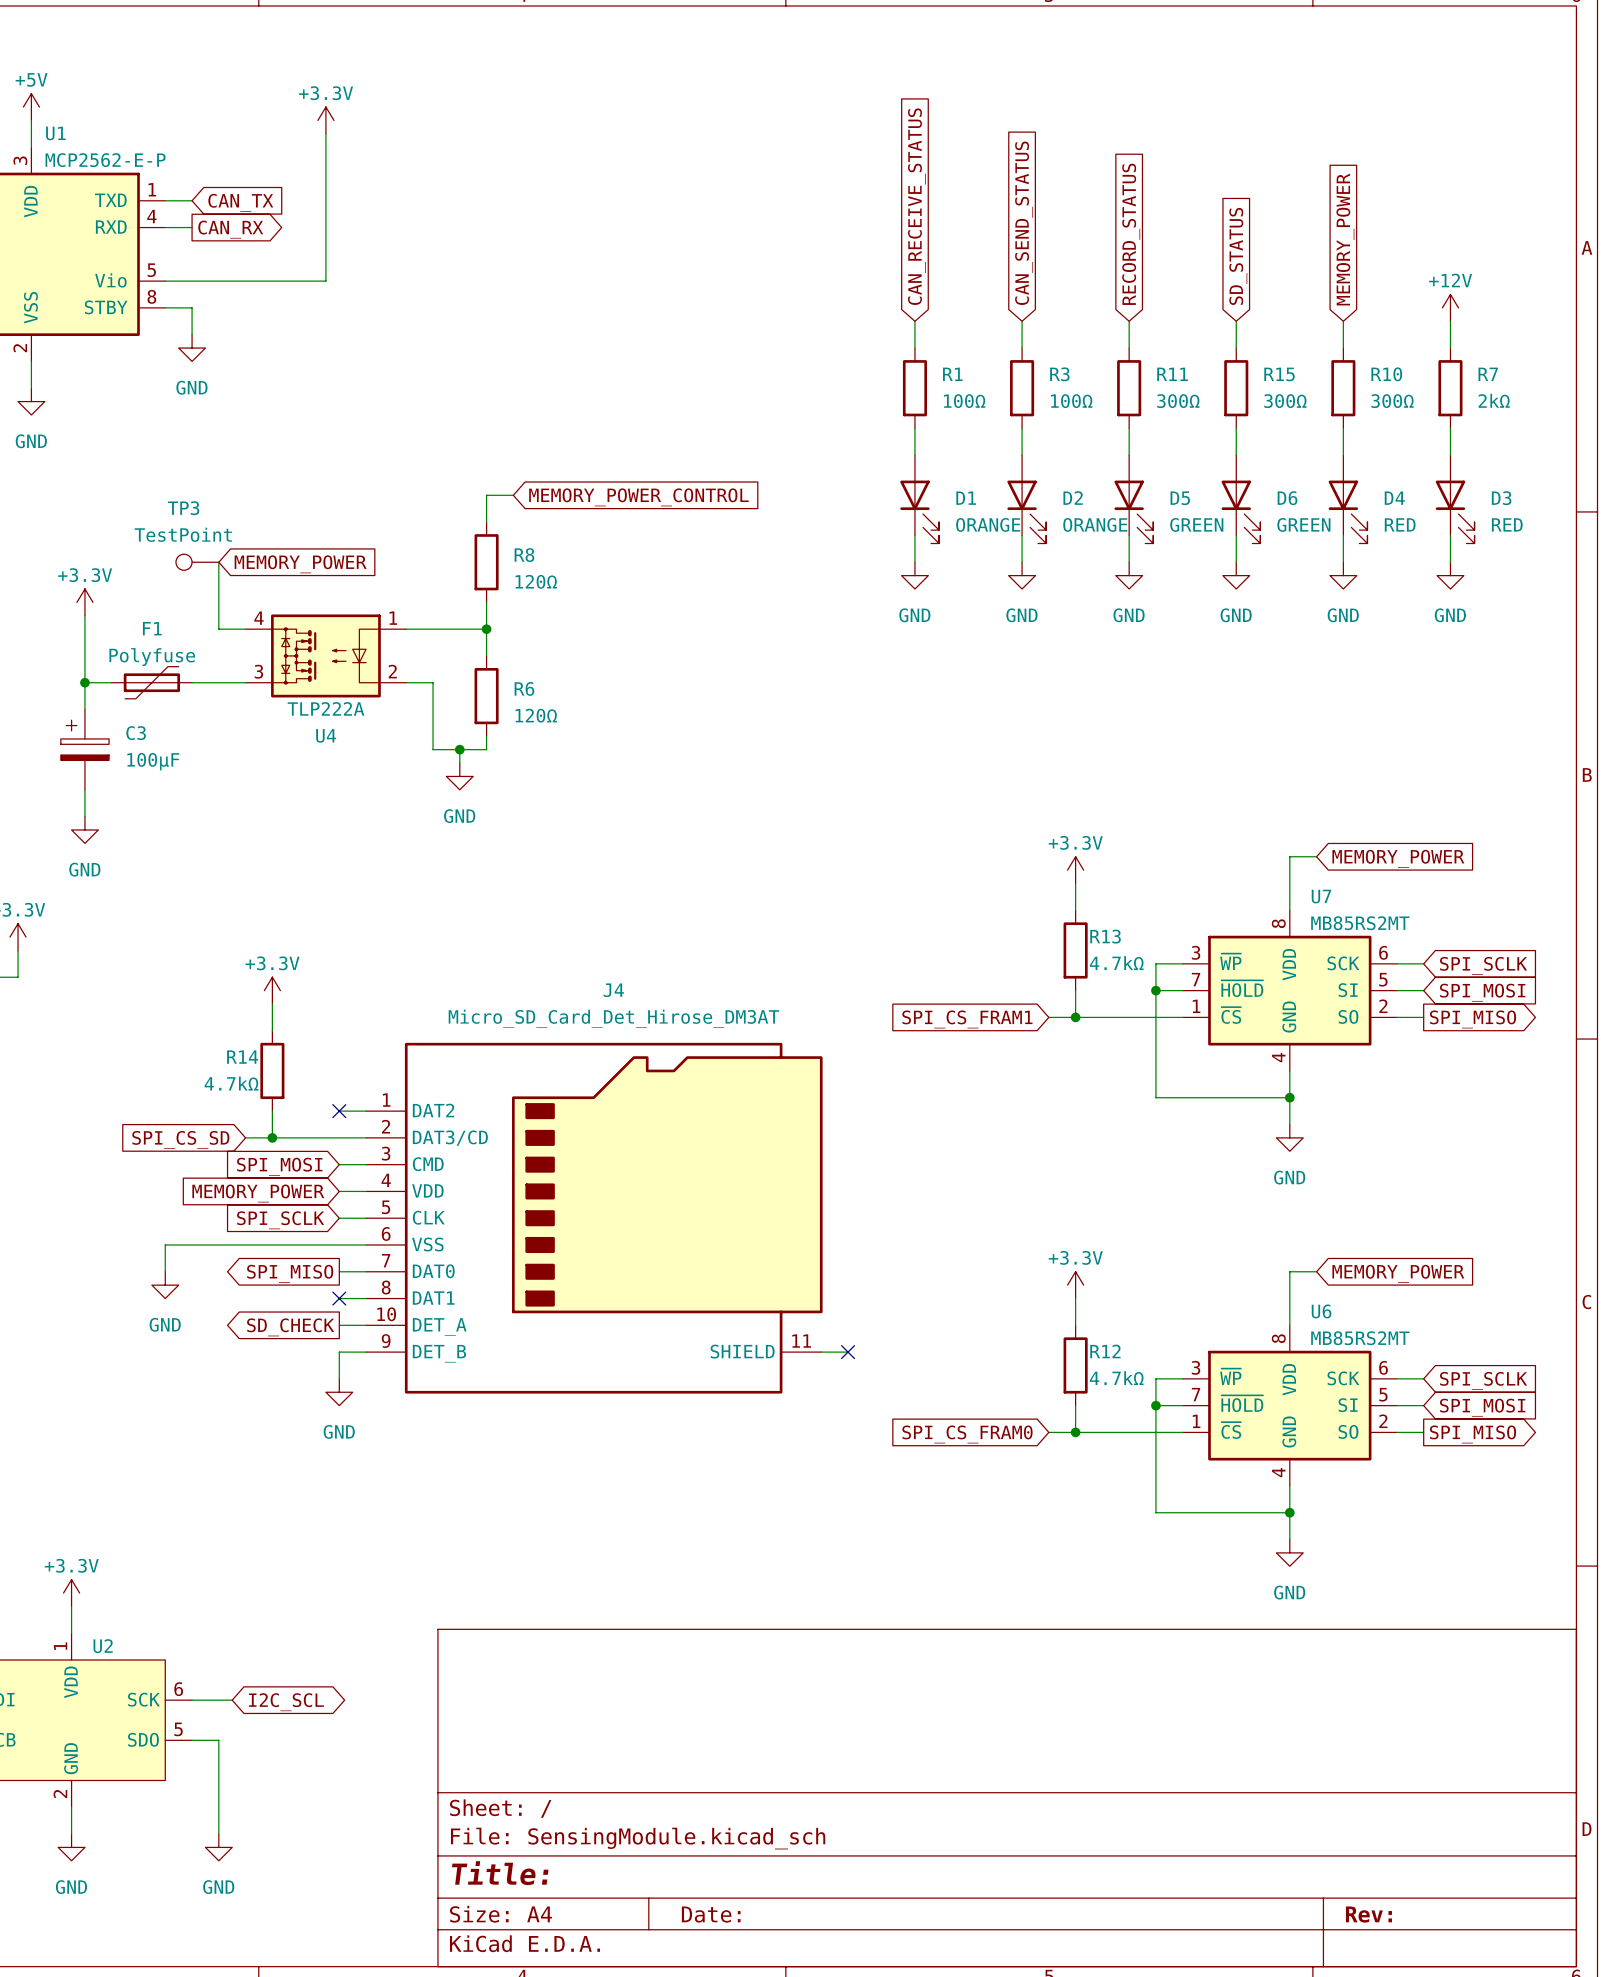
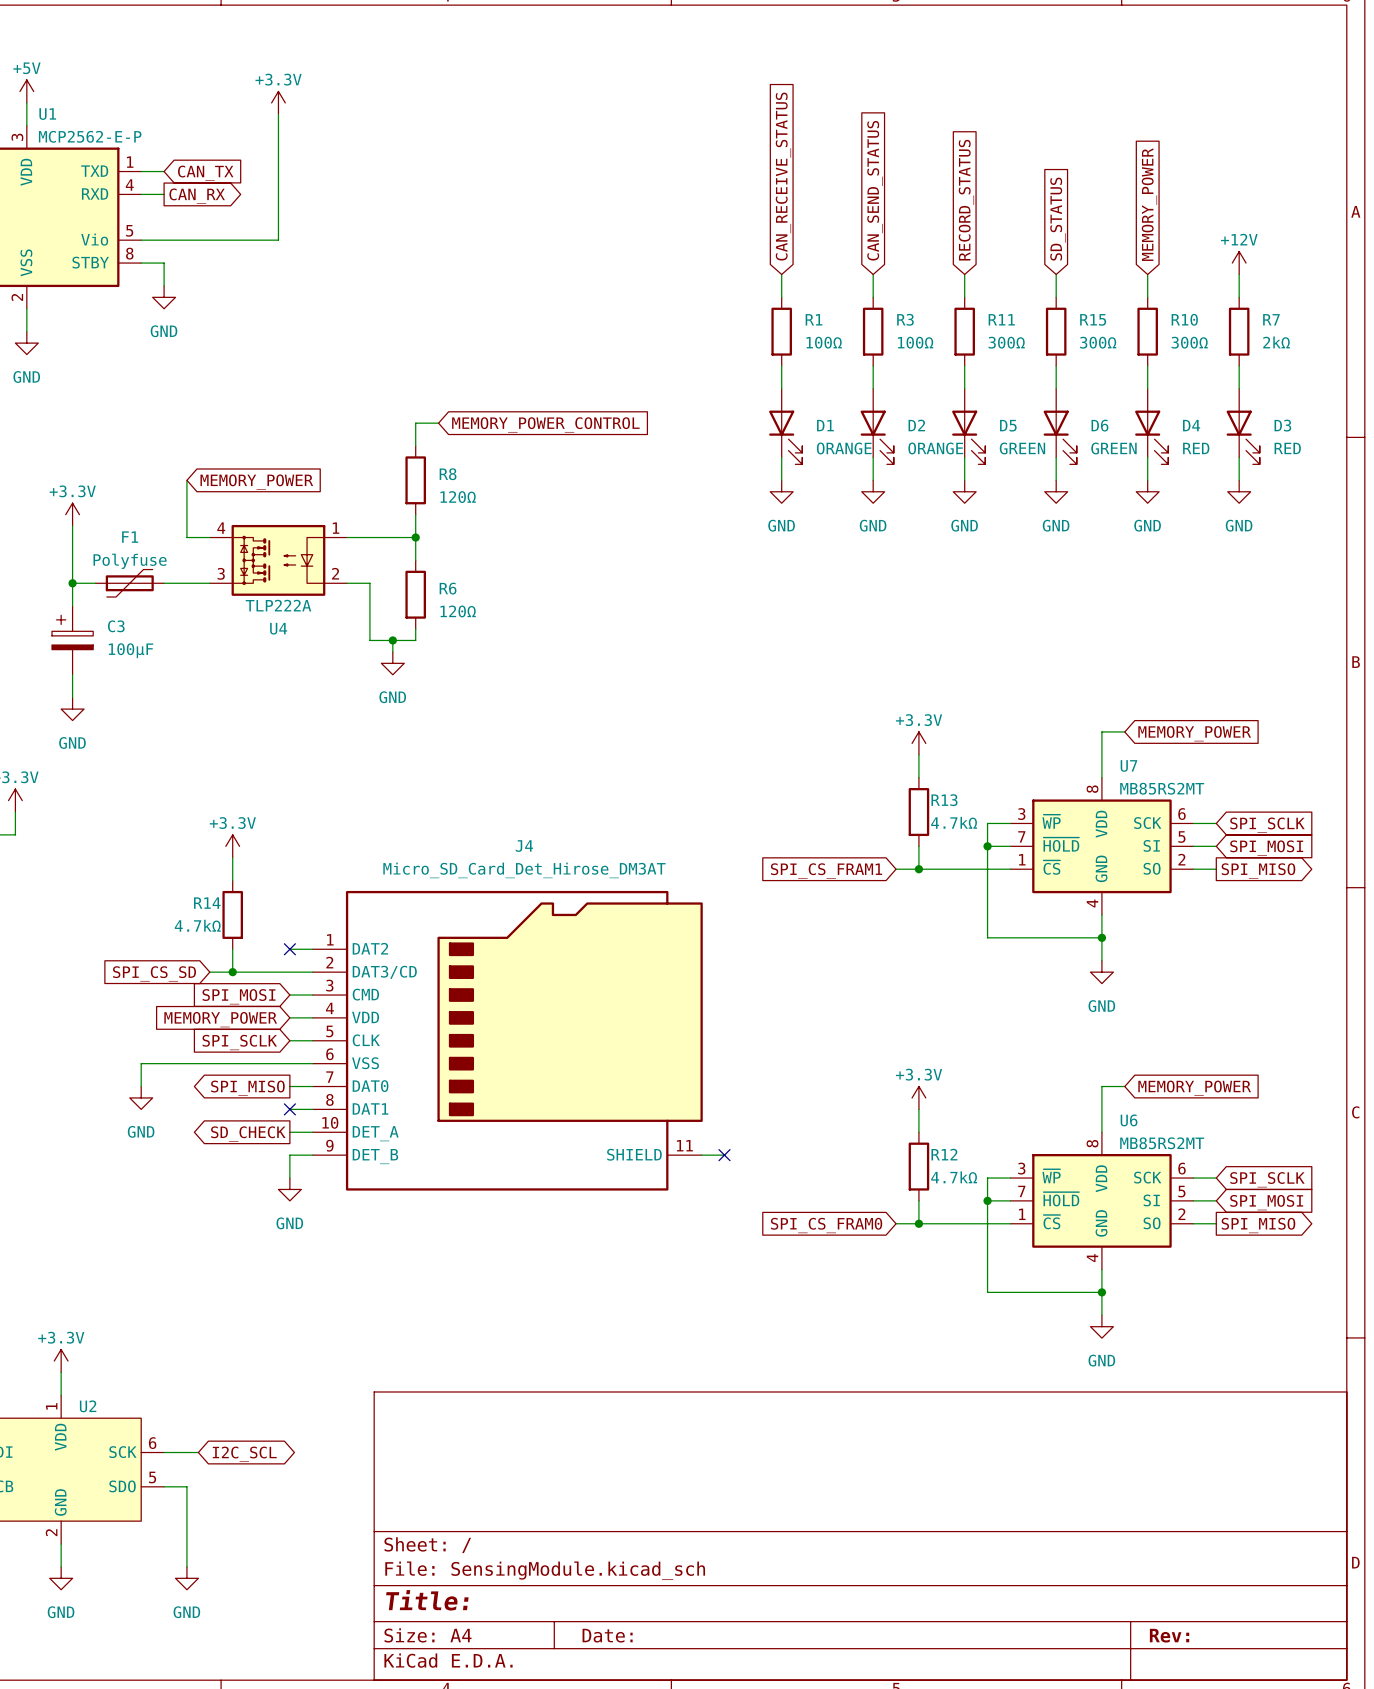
TP3: TestPoint (197, 562) -> none

